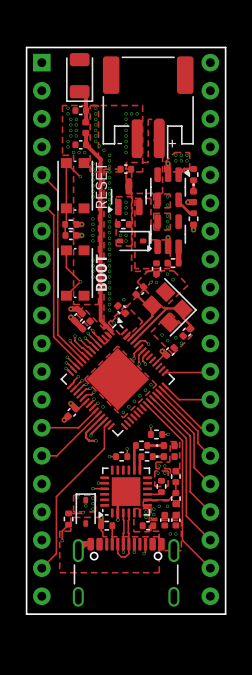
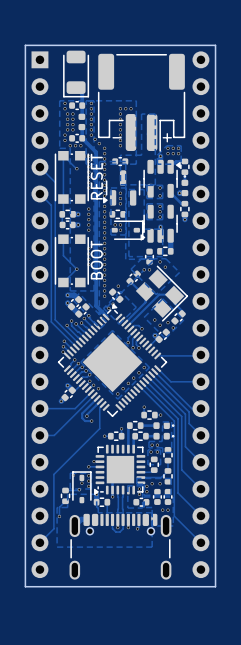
part rotation: 0° (166, 445) -> 180° (163, 425)
part rotation: 0° (166, 456) -> 180° (163, 436)

